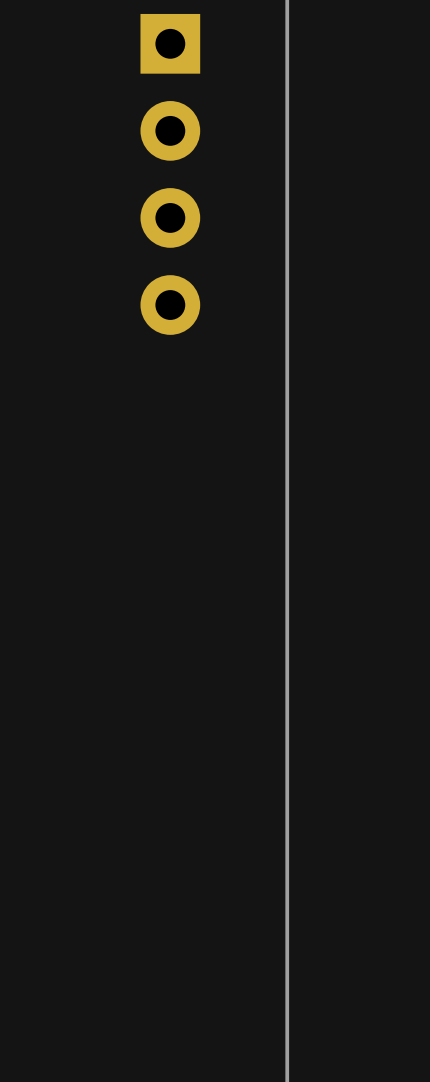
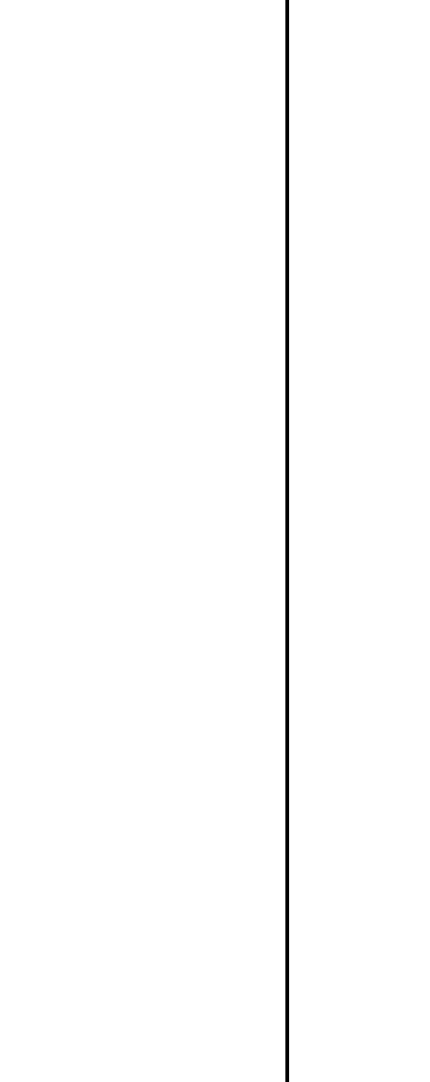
part: (170, 174) -> none

